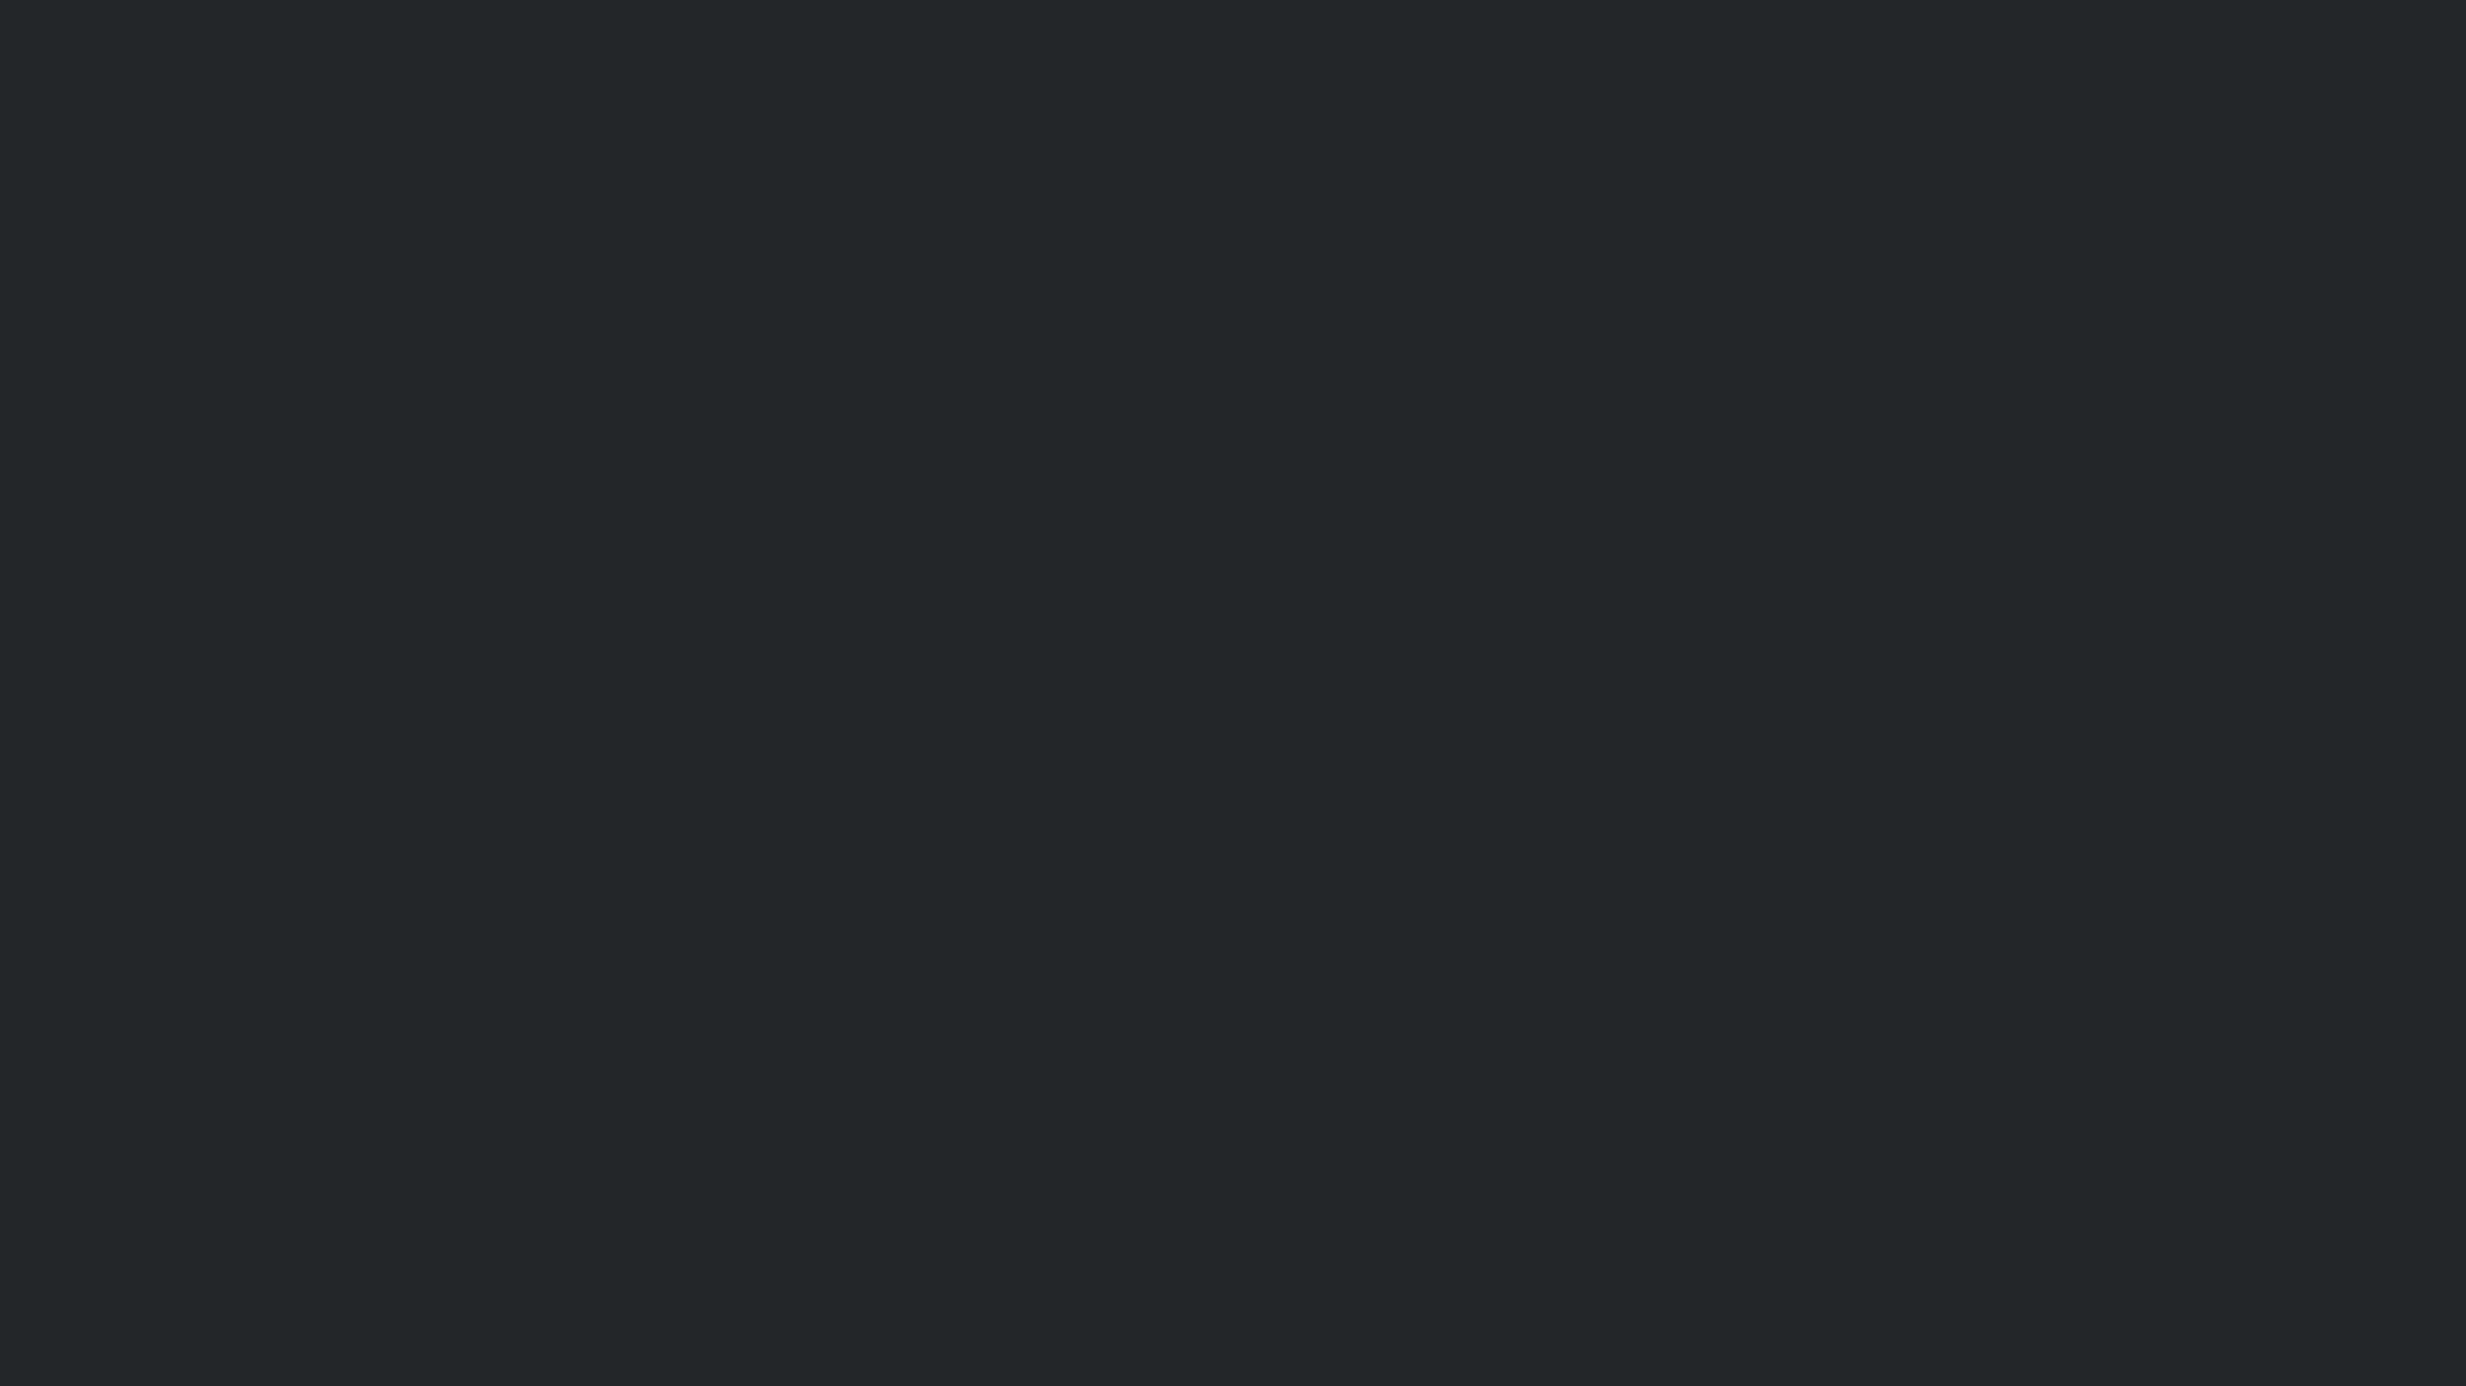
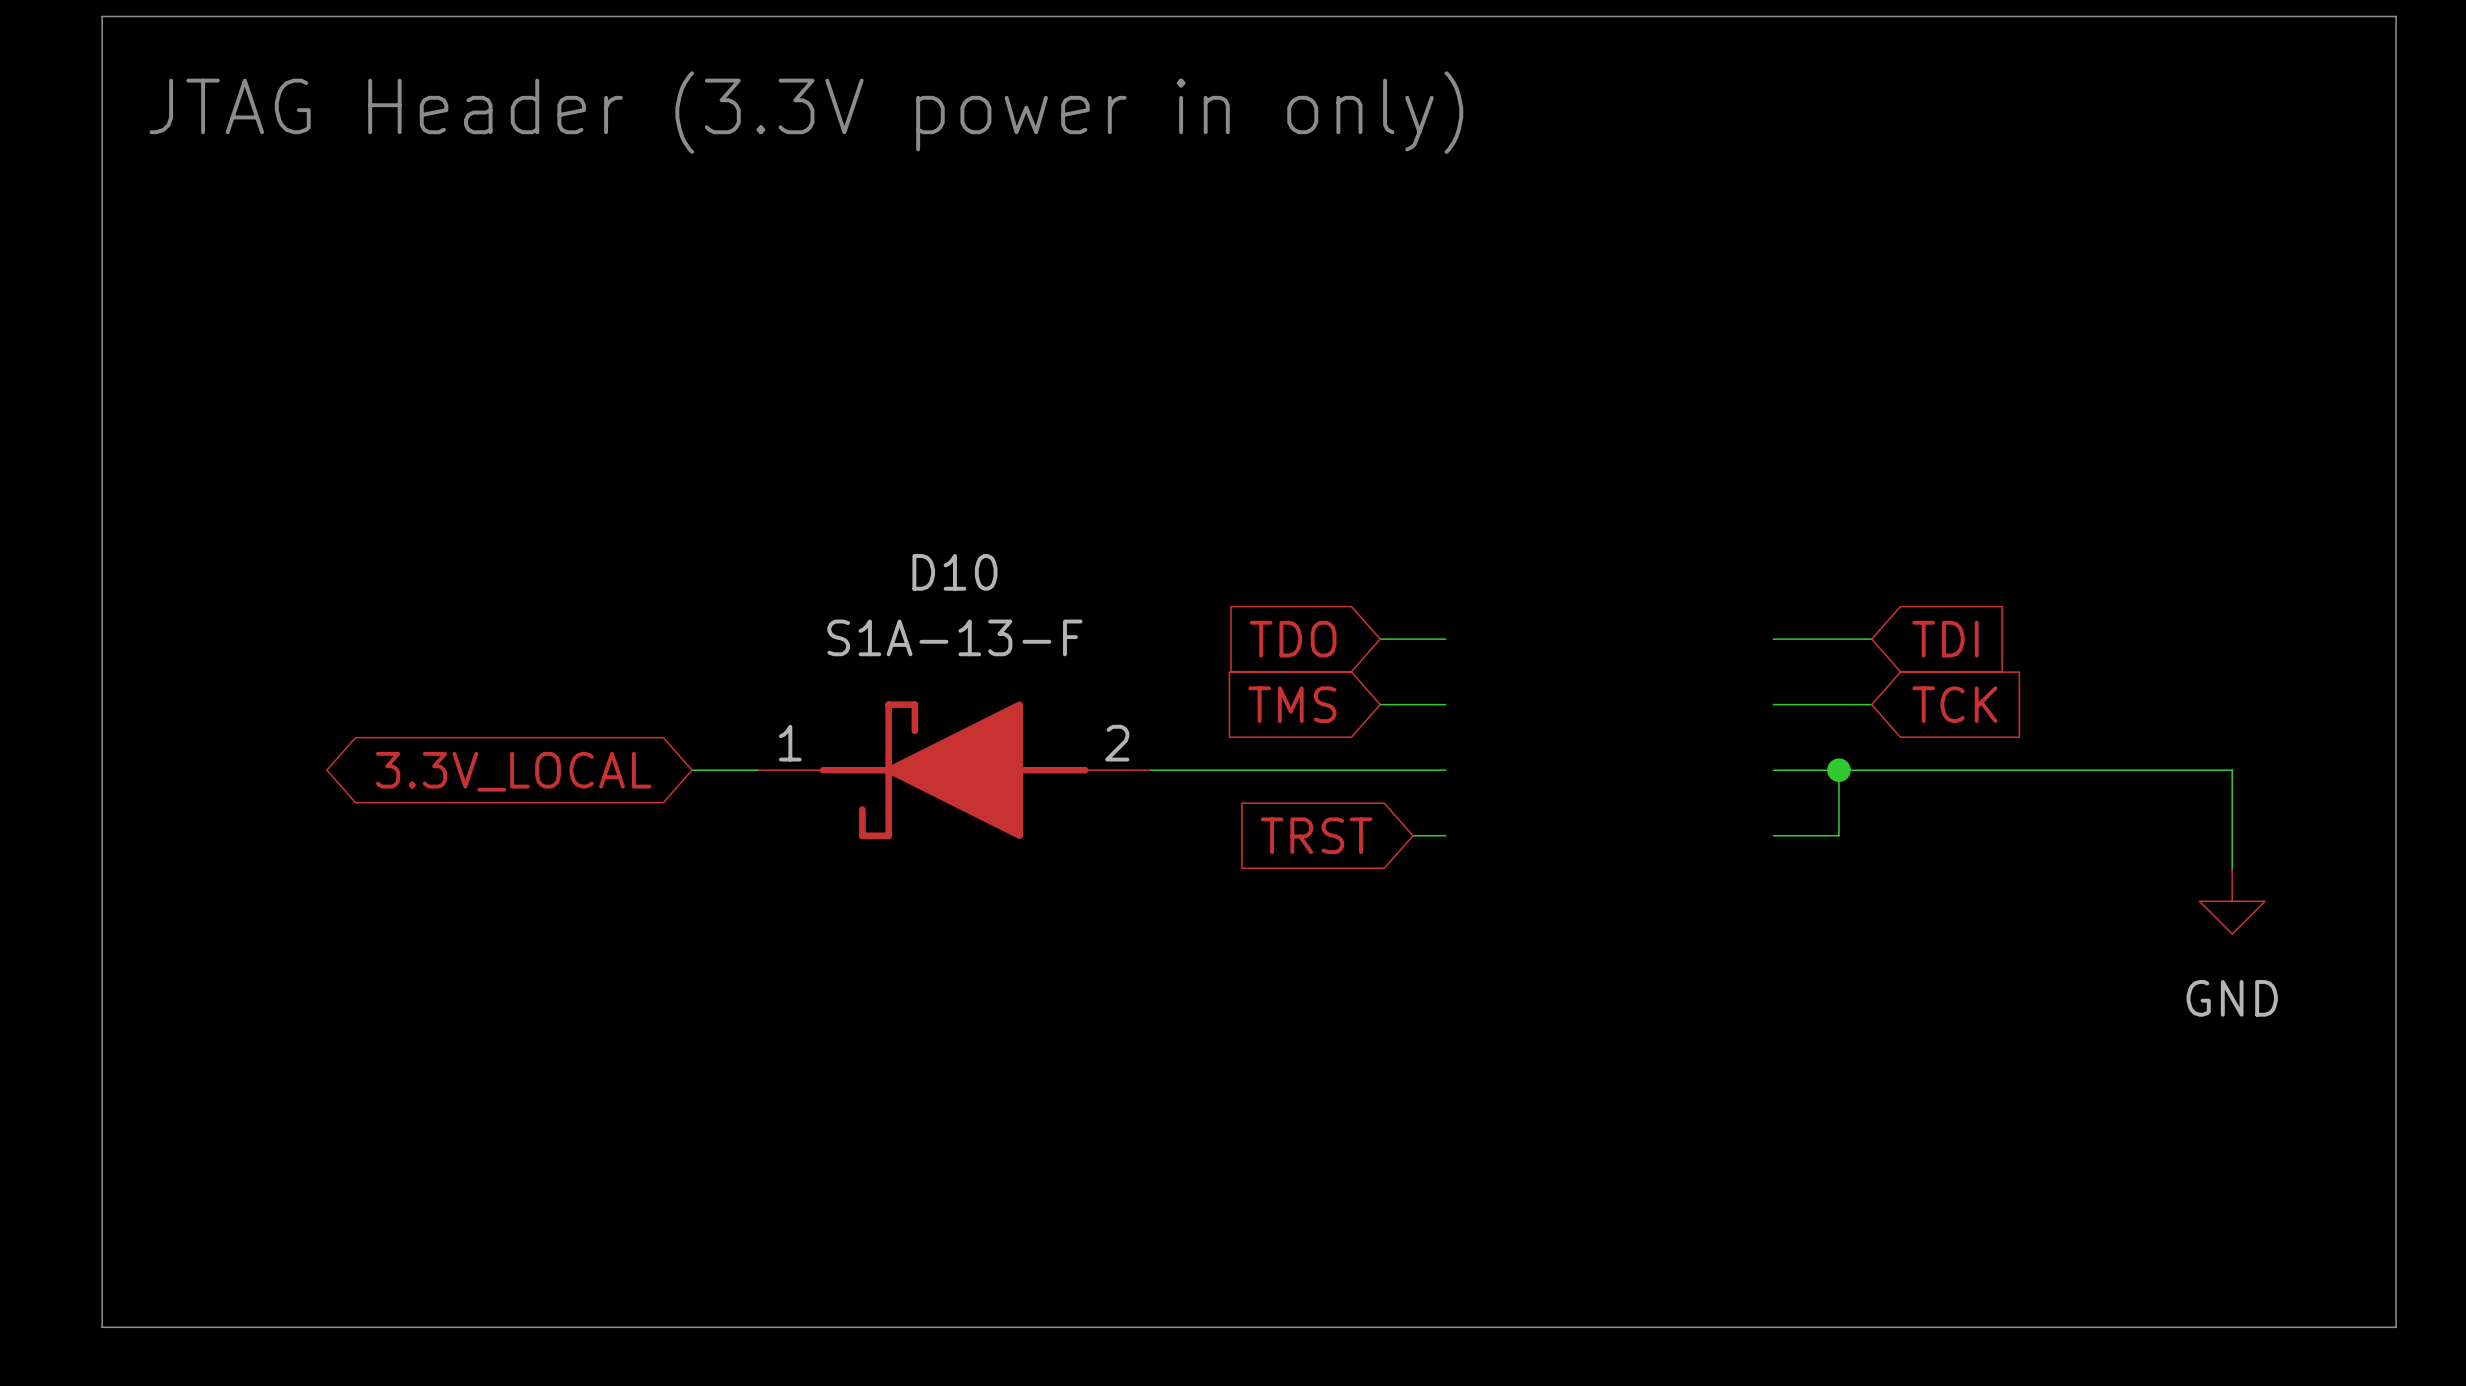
line: none -> (102, 16) (2396, 16) (2396, 1327) (102, 1327) (102, 16)
text: none -> JTAG Header (3.3V power in only) (806, 112)
global label: none -> TDO (1293, 639)
wire: none -> (1380, 639) (1445, 639)
wire: none -> (1773, 639) (1871, 639)
global label: none -> TDI (1945, 639)
global label: none -> TMS (1292, 704)
wire: none -> (1380, 704) (1445, 704)
wire: none -> (1773, 704) (1871, 704)
global label: none -> TCK (1954, 704)
wire: none -> (692, 770) (757, 770)
D10: none -> S1A-13-F (954, 770)
wire: none -> (1150, 770) (1445, 770)
wire: none -> (1773, 770) (2232, 770) (2232, 868)
wire: none -> (1838, 770) (1838, 835) (1773, 835)
junction: none -> (1838, 770)
global label: none -> 3.3V_LOCAL (513, 771)
global label: none -> TRST (1316, 835)
wire: none -> (1412, 835) (1445, 835)
power symbol: none -> GND (2232, 901)

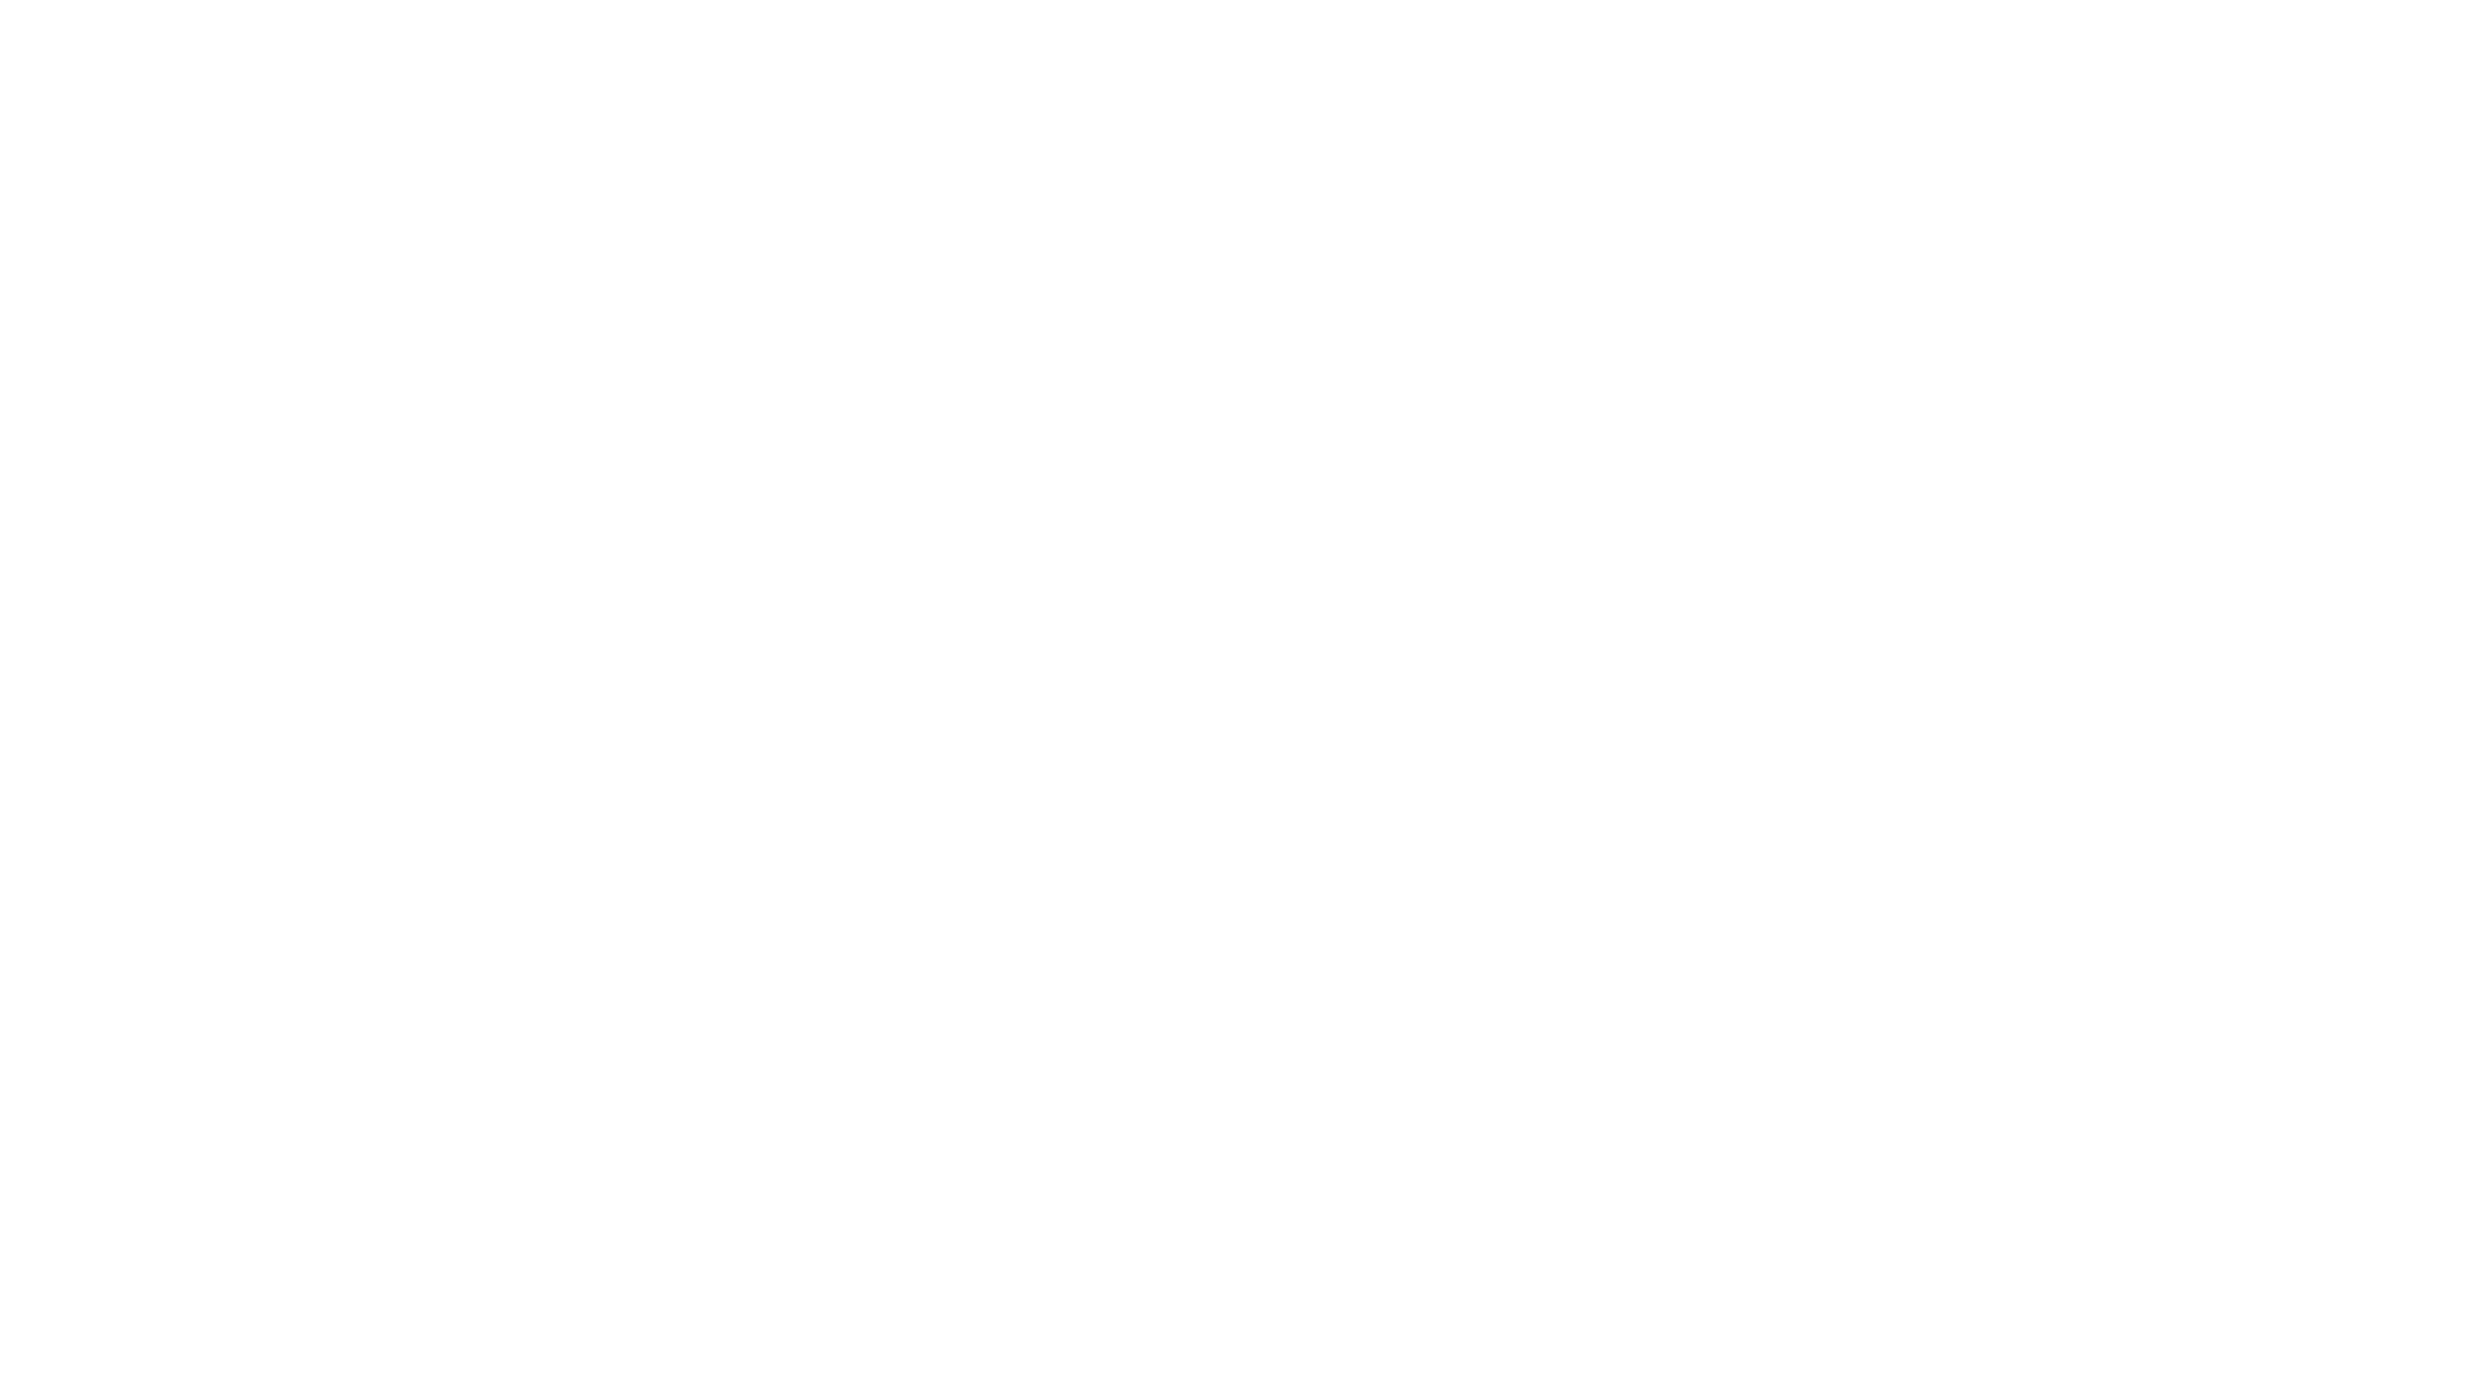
line: (102, 16) (2396, 16) (2396, 1327) (102, 1327) (102, 16) -> none
text: JTAG Header (3.3V power in only) (806, 112) -> none
global label: TDO (1293, 639) -> none
wire: (1380, 639) (1445, 639) -> none
wire: (1773, 639) (1871, 639) -> none
global label: TDI (1945, 639) -> none
global label: TMS (1292, 704) -> none
wire: (1380, 704) (1445, 704) -> none
wire: (1773, 704) (1871, 704) -> none
global label: TCK (1954, 704) -> none
wire: (692, 770) (757, 770) -> none
D10: S1A-13-F (954, 770) -> none
wire: (1150, 770) (1445, 770) -> none
wire: (1773, 770) (2232, 770) (2232, 868) -> none
wire: (1838, 770) (1838, 835) (1773, 835) -> none
junction: (1838, 770) -> none
global label: 3.3V_LOCAL (513, 771) -> none
global label: TRST (1316, 835) -> none
wire: (1412, 835) (1445, 835) -> none
power symbol: GND (2232, 901) -> none

